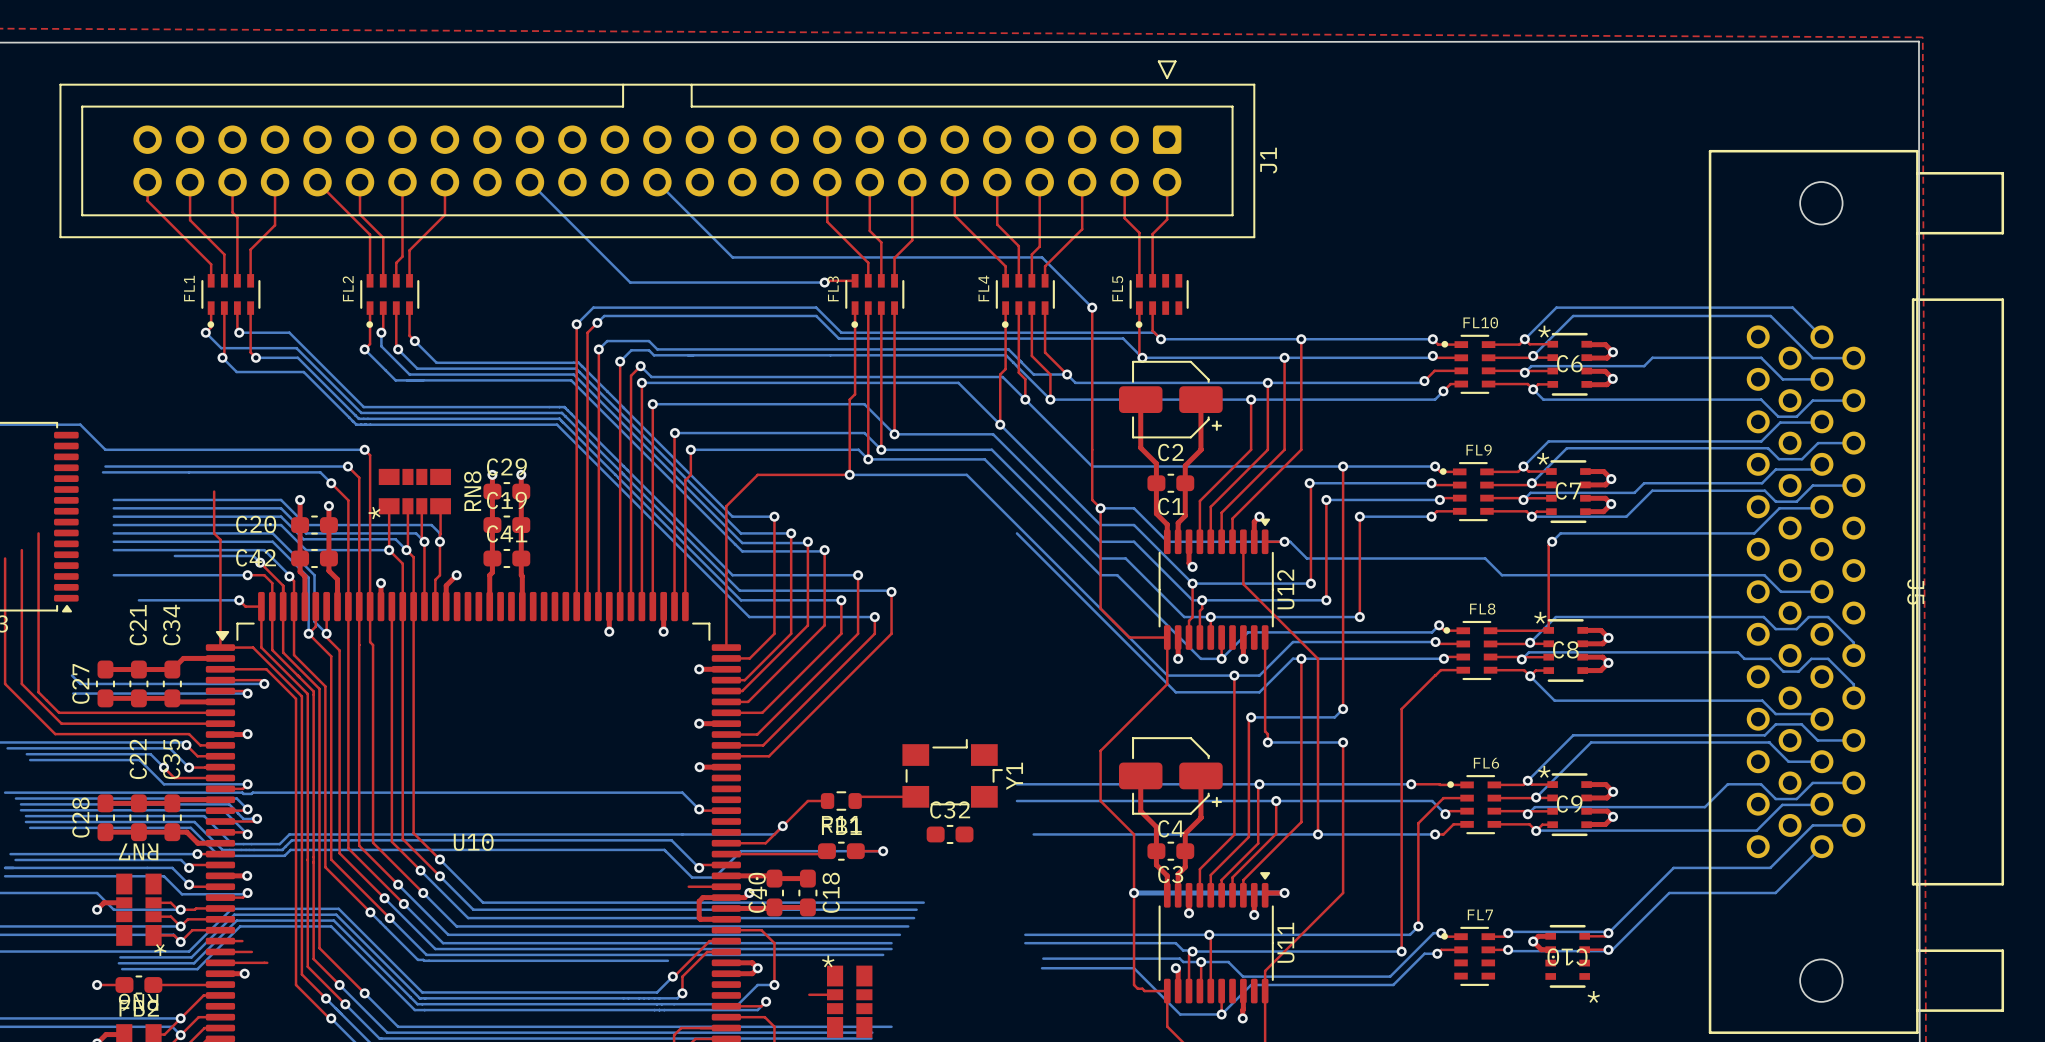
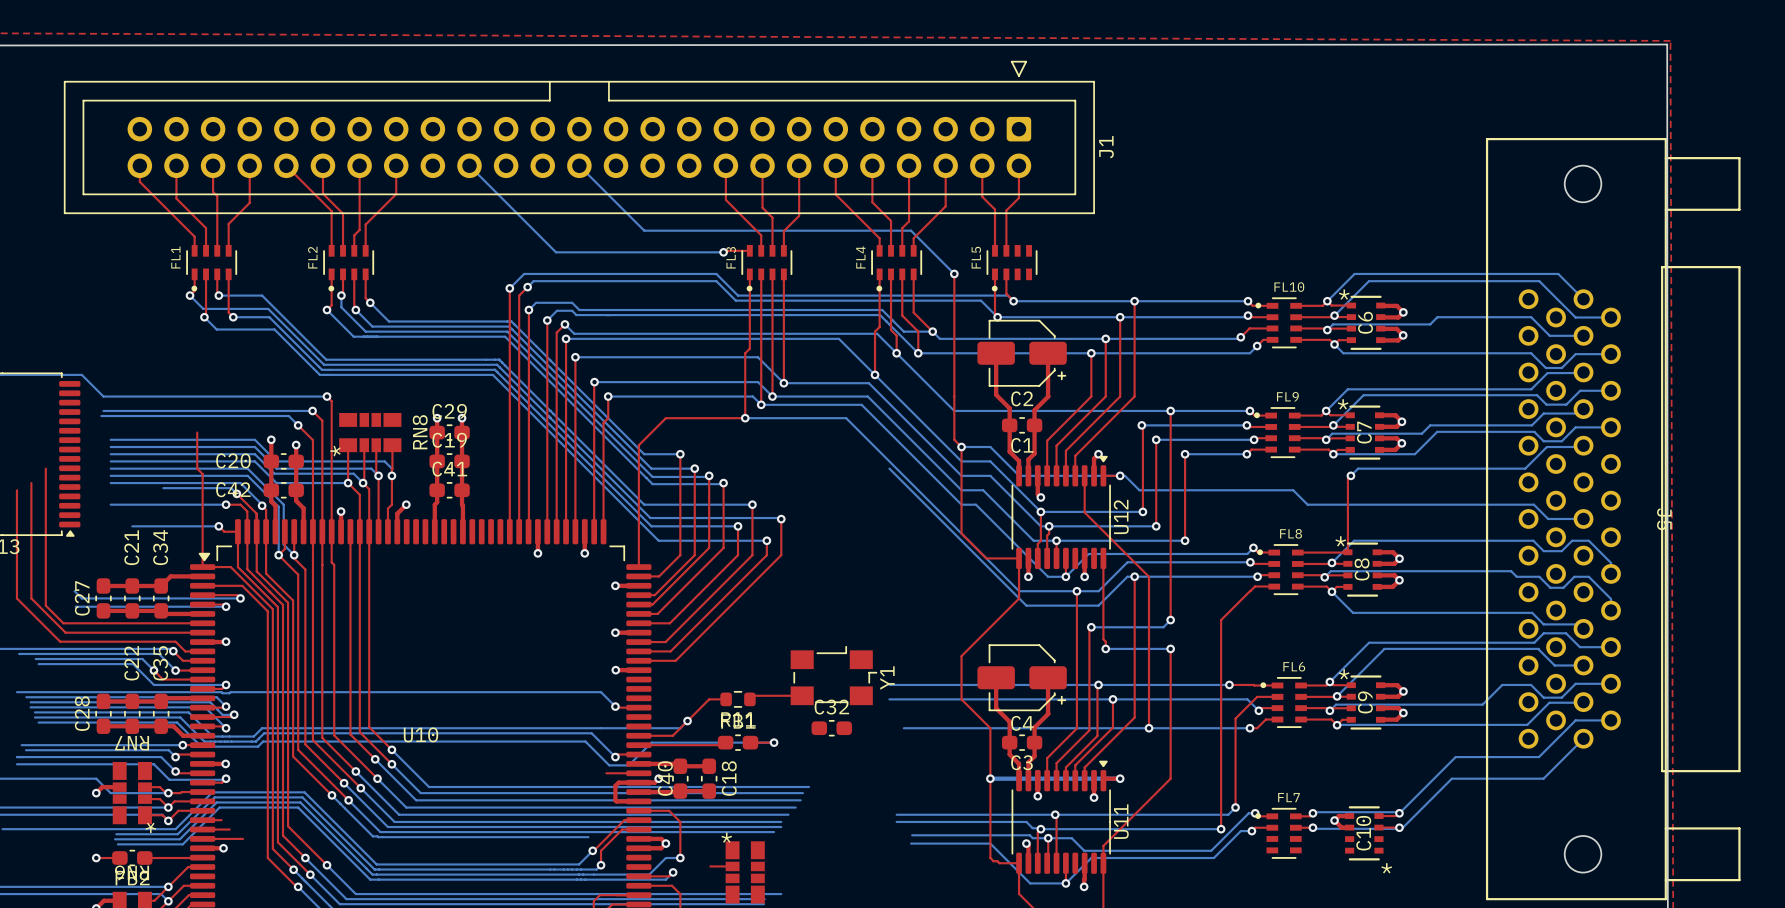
C6 name rotation: 0° (1569, 363) -> 90° counterclockwise (1365, 322)
C7 name rotation: 0° (1568, 490) -> 90° counterclockwise (1364, 432)
C8 name rotation: 0° (1565, 649) -> 90° counterclockwise (1362, 569)
C9 name rotation: 0° (1569, 804) -> 90° counterclockwise (1365, 702)
C10 name rotation: 0° (1567, 957) -> 90° clockwise (1363, 833)

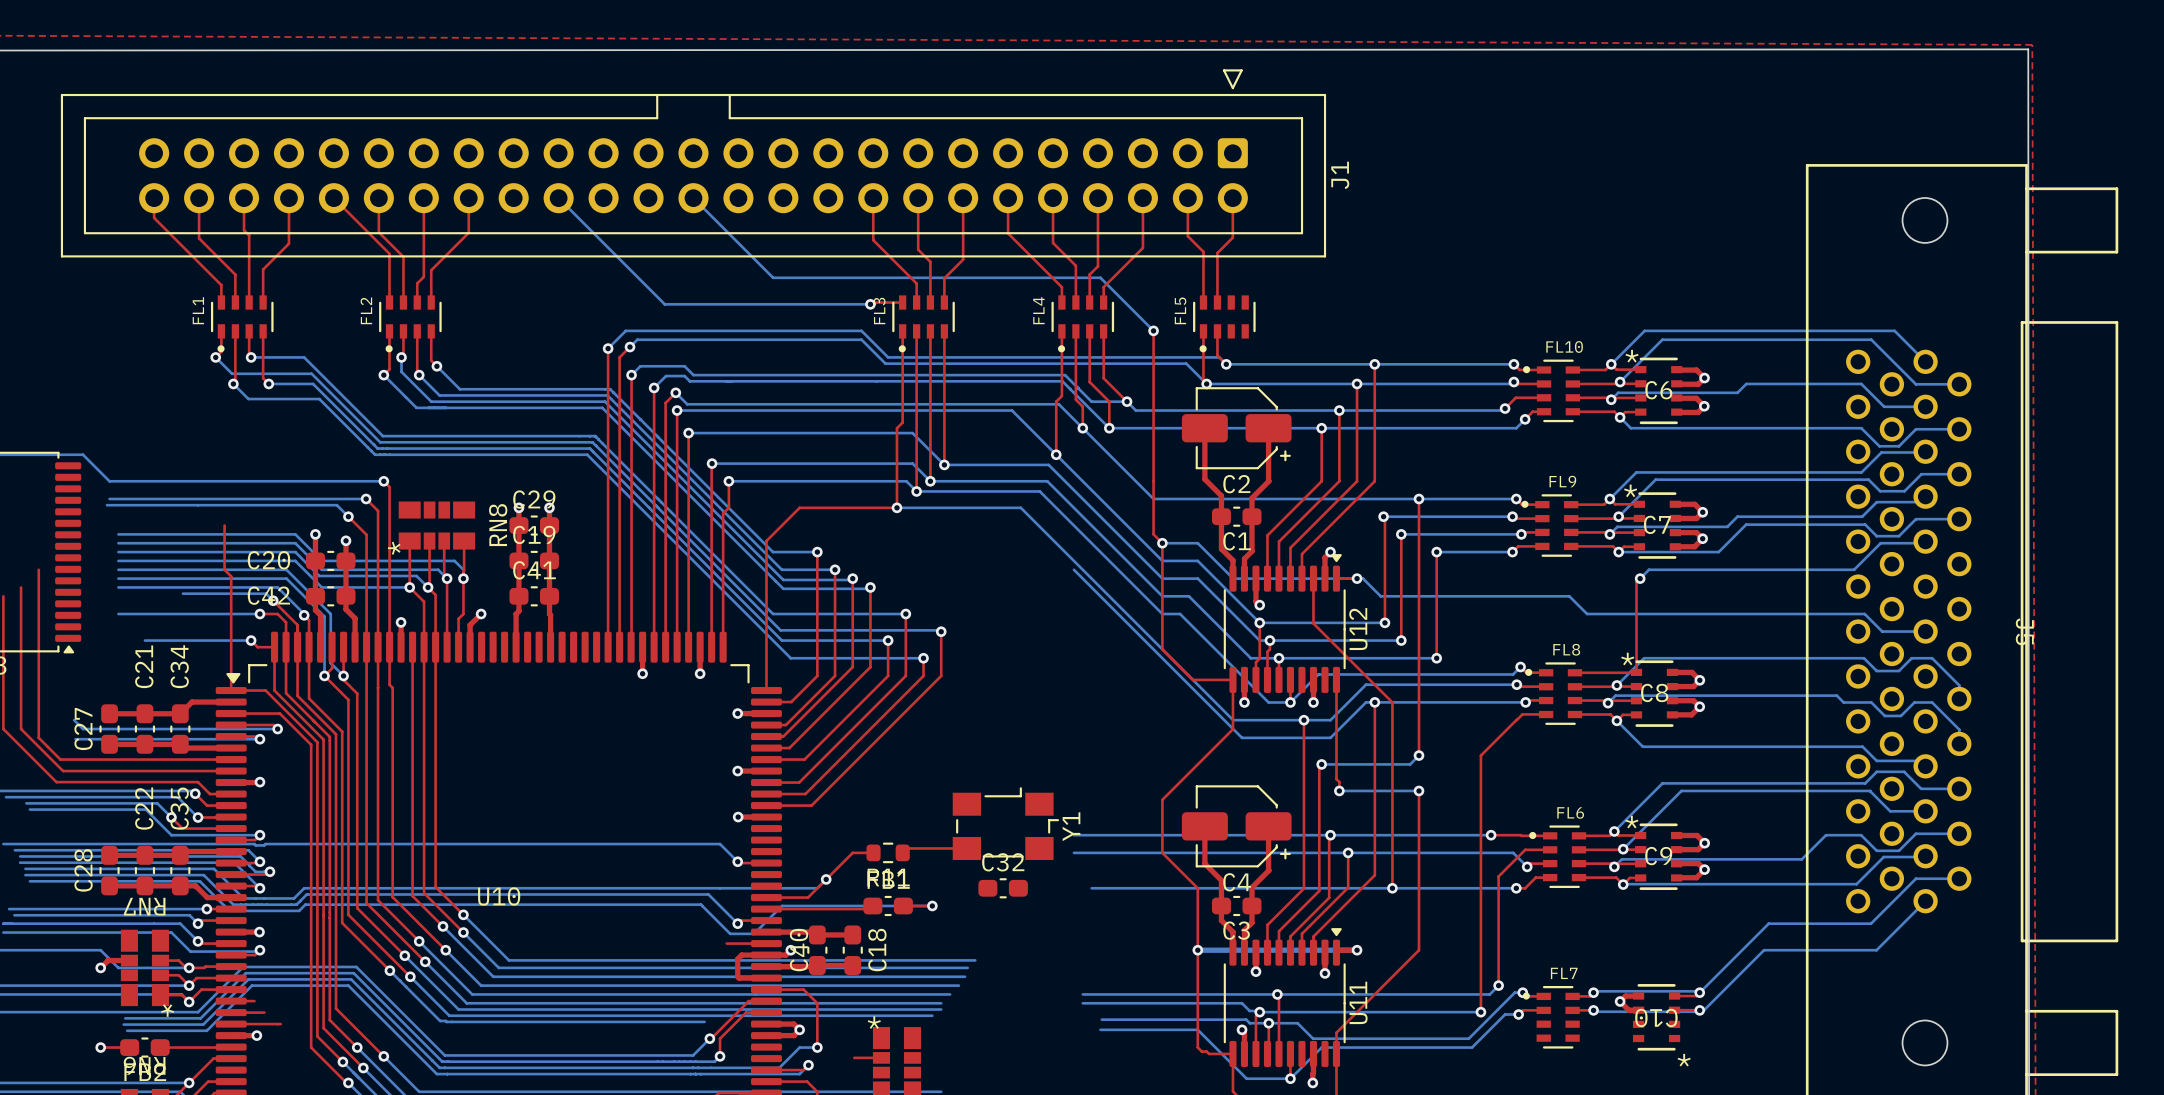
C6 name rotation: 0° (1365, 322) -> 90° clockwise (1658, 390)
C7 name rotation: 0° (1364, 432) -> 90° clockwise (1657, 524)
C8 name rotation: 0° (1362, 569) -> 90° clockwise (1654, 692)
C9 name rotation: 0° (1365, 702) -> 90° clockwise (1658, 856)
C10 name rotation: 0° (1363, 833) -> 90° counterclockwise (1656, 1017)

